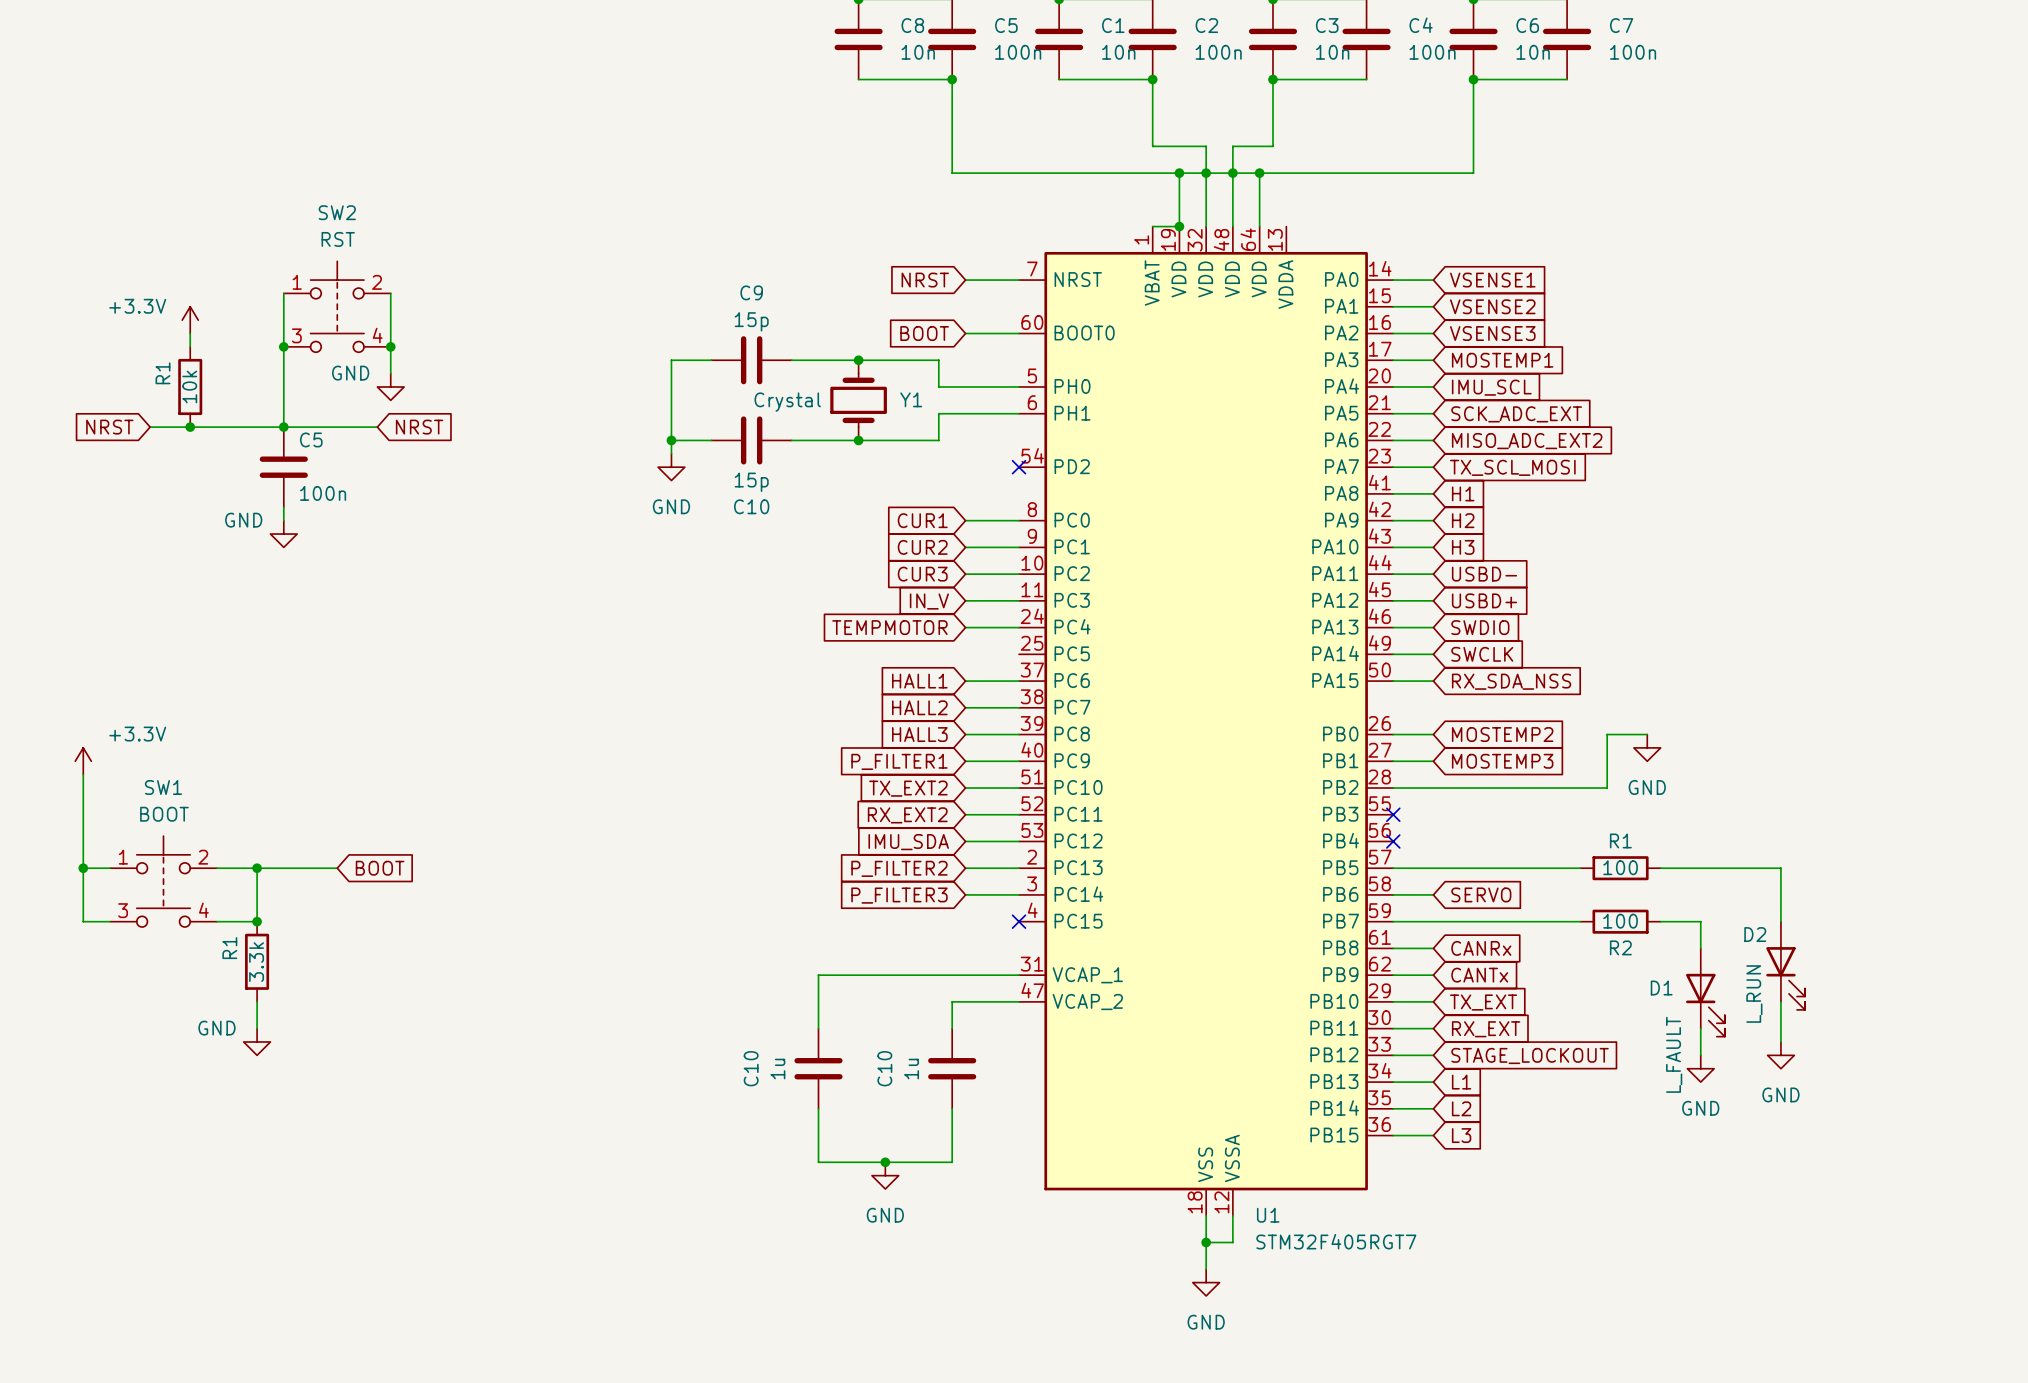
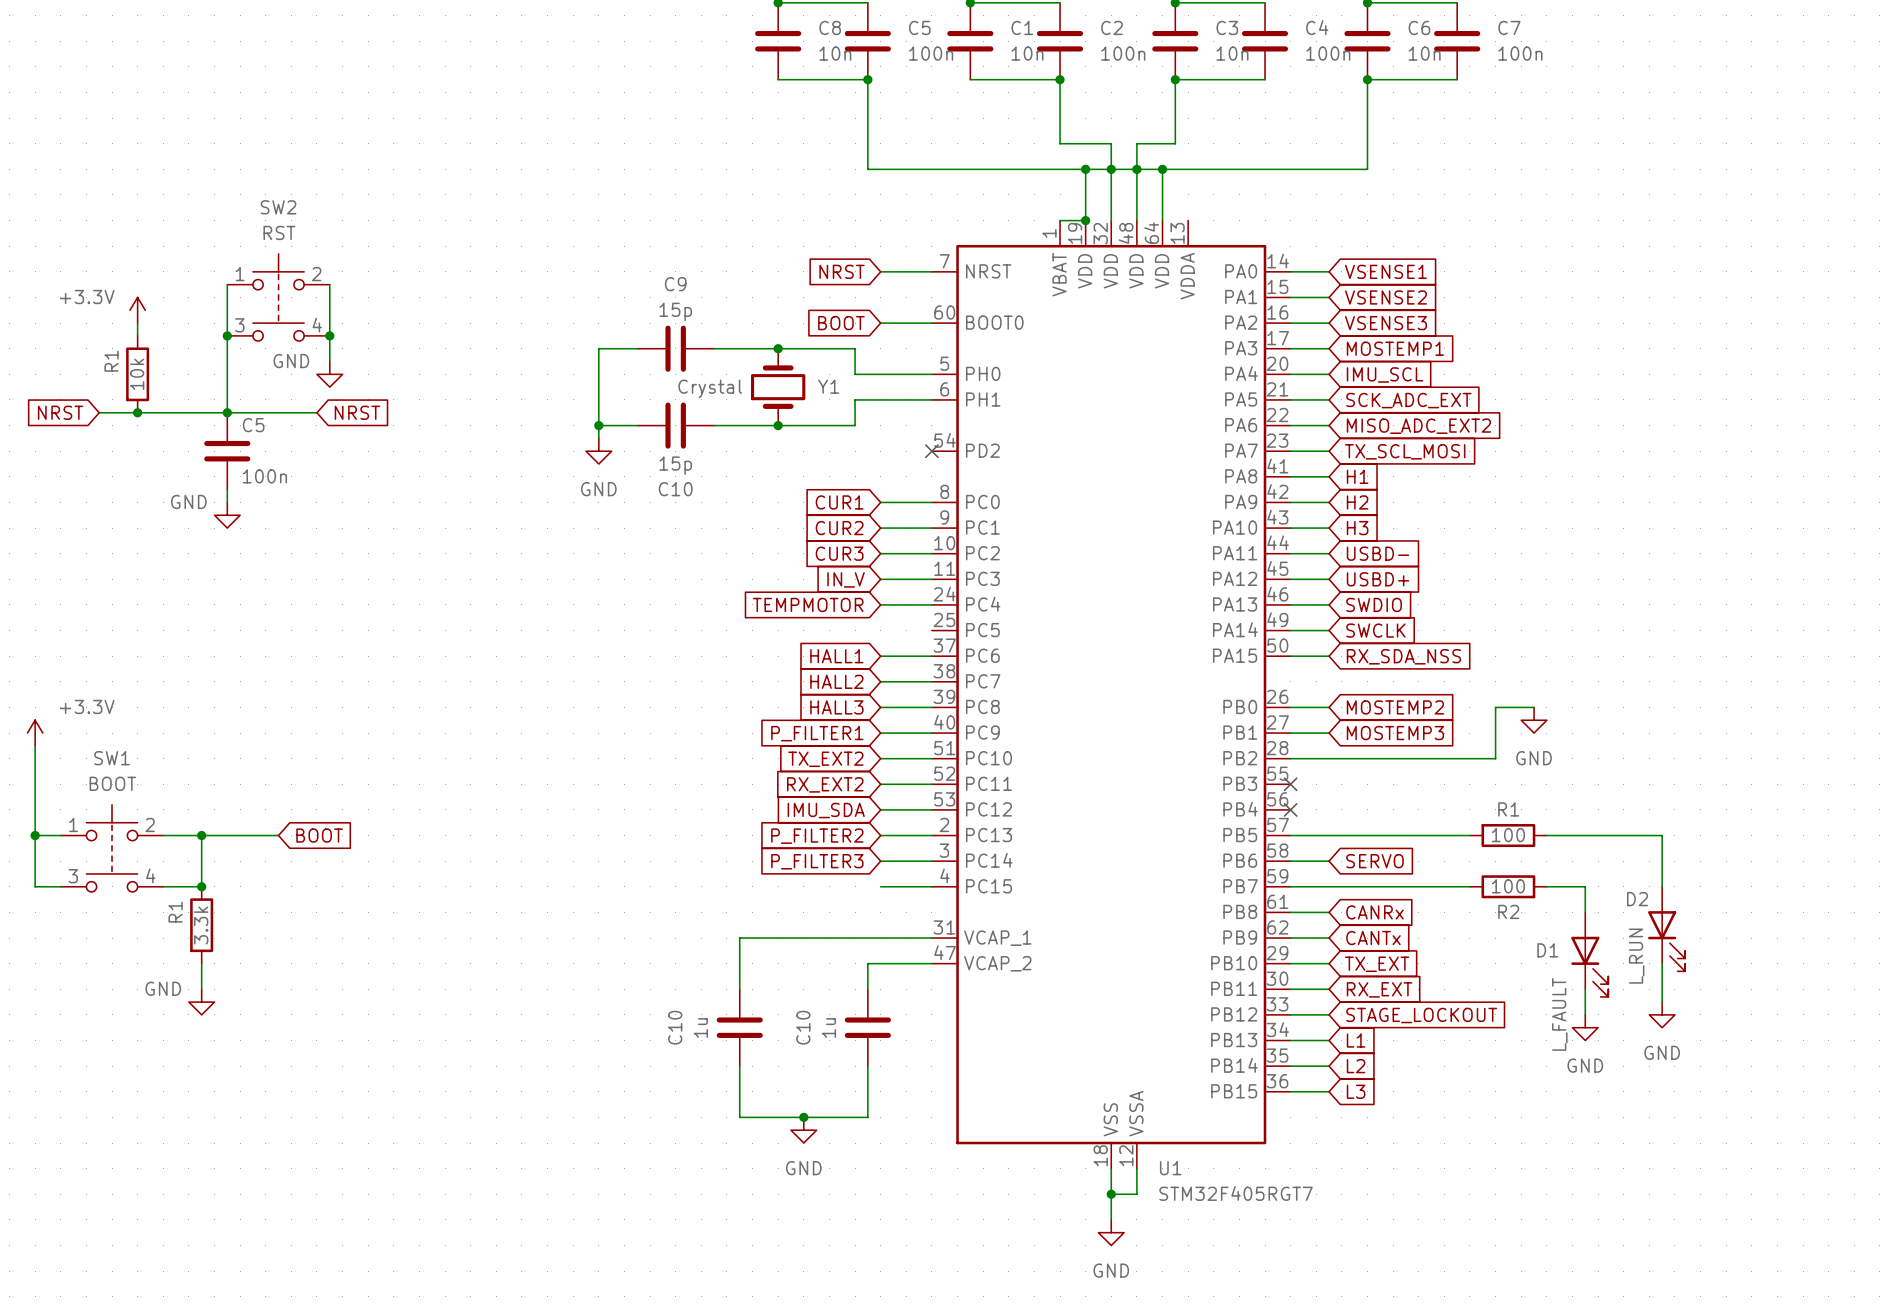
wire: none -> (880, 886) (931, 886)
no-connect mark: (1019, 921) -> none

